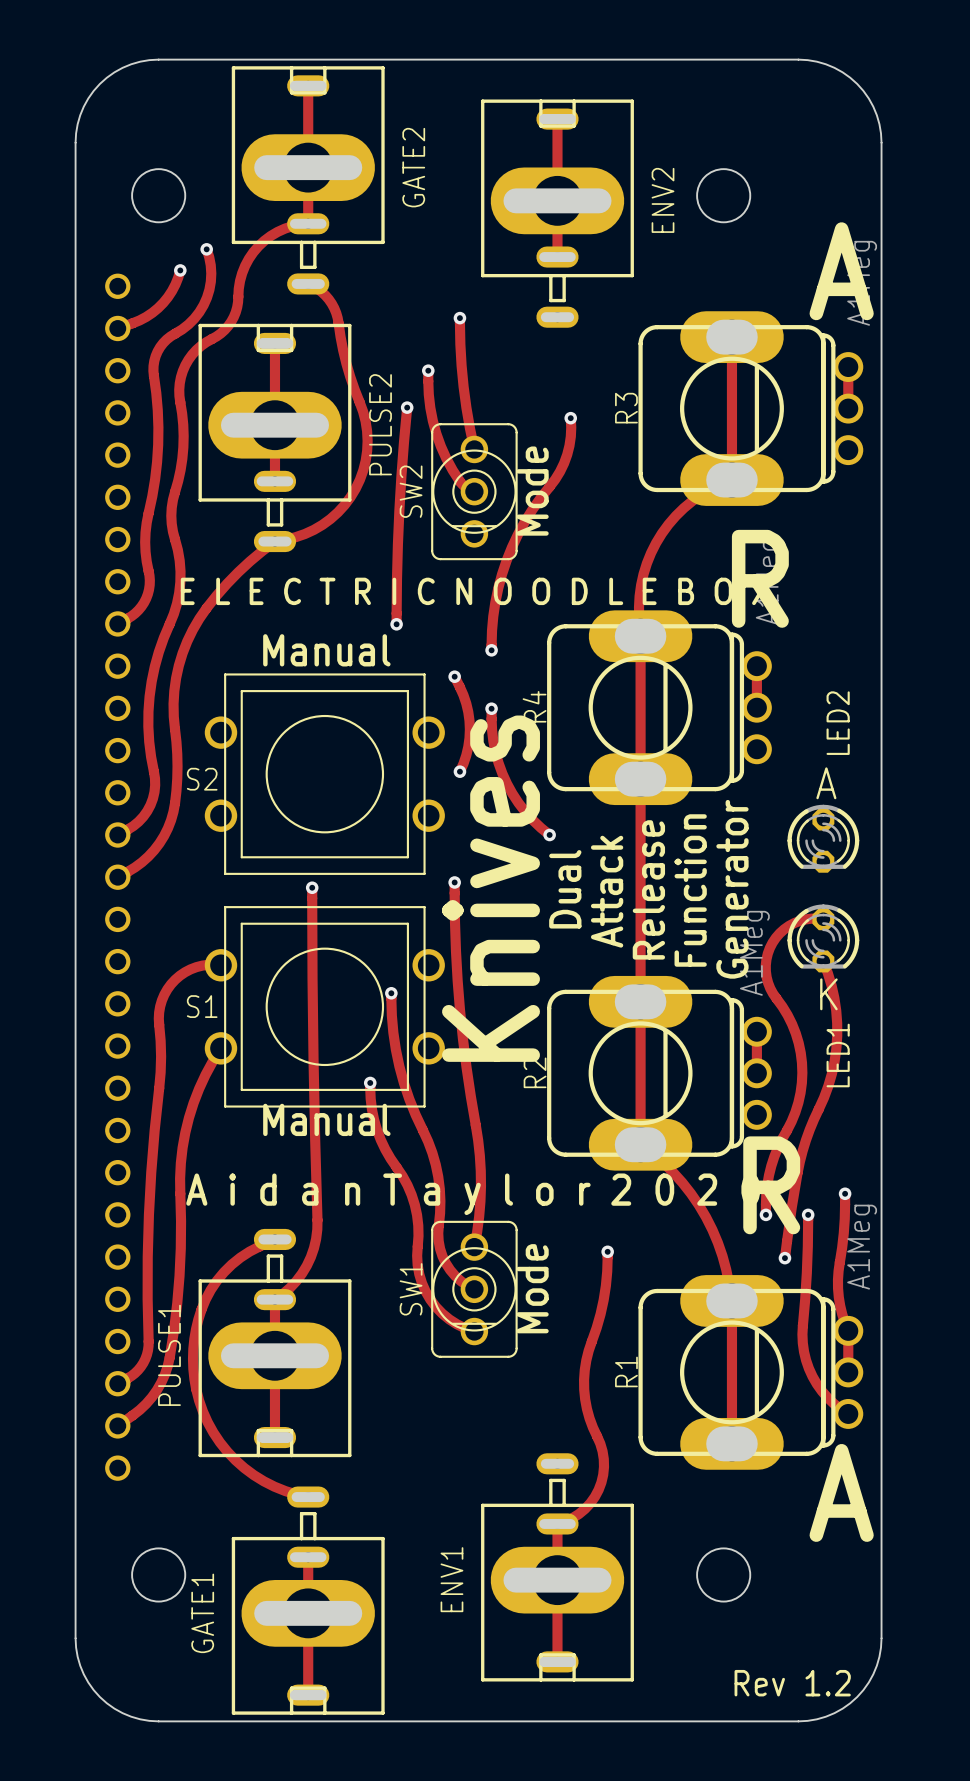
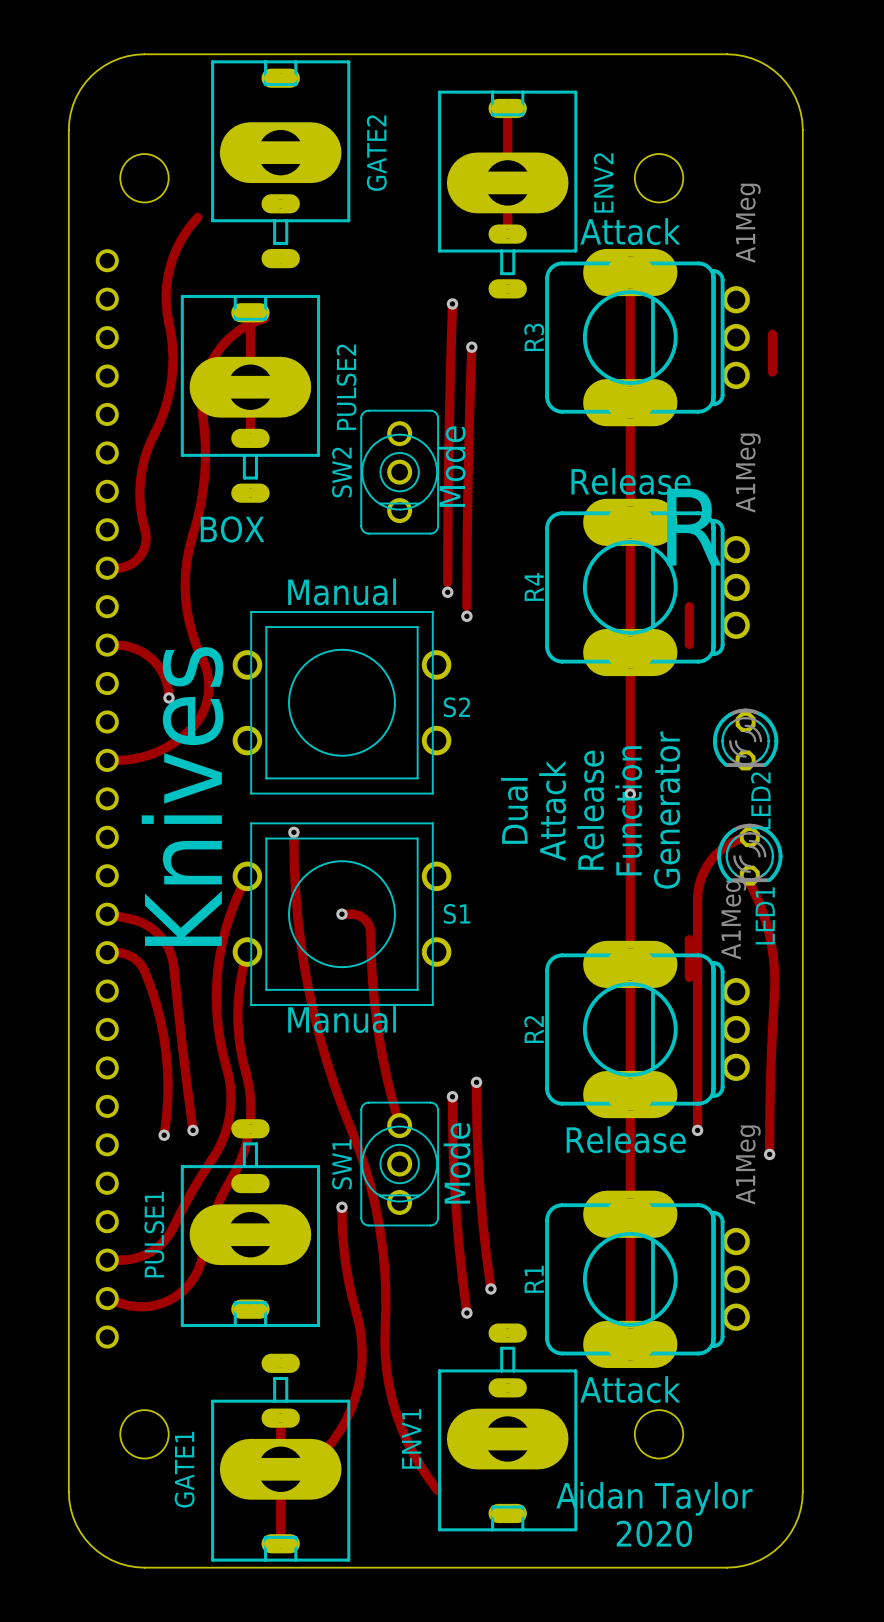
track: (308, 85) (308, 223) (292, 226) (277, 231) (258, 246) (248, 258) (242, 273) (237, 307) (231, 321) (220, 333) (196, 349) (185, 365) (179, 389) (183, 424) (183, 447) (175, 492) -> none
track: (206, 249) (210, 265) (210, 281) (203, 305) (188, 324) (163, 343) (154, 360) (158, 444) (155, 479) (145, 532) (145, 551) (149, 585) (147, 594) (141, 606) (131, 616) (117, 623) -> (197, 217) (180, 240) (173, 257) (168, 275) (166, 304) (172, 345) (172, 368) (167, 402) (146, 451) (141, 471) (140, 500) (146, 536) (144, 546) (137, 558) (129, 565) (119, 568) (107, 568)
via: (206, 249) -> none
text: none -> Attack (630, 231)
track: (180, 270) (172, 290) (158, 308) (139, 320) (117, 328) -> none
via: (180, 270) -> none
text: A (841, 271) -> none
track: (308, 283) (325, 295) (336, 313) (346, 363) (365, 421) (367, 441) (363, 470) (350, 497) (330, 519) (304, 534) (274, 541) (238, 572) (206, 608) (187, 641) (178, 665) (174, 690) (175, 729) -> none
track: none -> (630, 272) (630, 1344)
track: (459, 318) (463, 386) (474, 449) -> none
via: (459, 318) -> none
track: none -> (452, 303) (447, 582)
via: none -> (452, 303)
track: (731, 337) (731, 480) (711, 488) (692, 500) (675, 515) (661, 533) (646, 563) (641, 585) (639, 607) (640, 1144) (672, 1172) (690, 1193) (706, 1217) (722, 1256) (731, 1300) (731, 1443) -> none
track: (428, 370) (430, 407) (440, 446) (459, 481) (466, 487) (474, 491) -> none
via: (428, 370) -> none
track: none -> (471, 347) (466, 606)
via: none -> (471, 347)
track: (407, 407) (399, 510) (396, 624) -> none
via: (407, 407) -> none
R3 position: (750, 408) -> (647, 337)
track: (570, 418) (570, 436) (564, 463) (555, 479) (524, 521) (506, 560) (495, 602) (491, 650) -> none
via: (570, 418) -> none
SW2 position: (474, 491) -> (399, 472)
text position: Mode (532, 491) -> Mode (452, 466)
track: (175, 492) (171, 515) (179, 560) (179, 592) (173, 613) (154, 666) (148, 711) (149, 741) (154, 778) (154, 792) (150, 805) (143, 816) (133, 826) (117, 834) -> (265, 318) (240, 329) (220, 347) (211, 362) (202, 387) (204, 475) (200, 505) (187, 559) (185, 585) (189, 623) (208, 680) (208, 694) (204, 708) (193, 726) (165, 747) (141, 757) (107, 760)
text: none -> Release (630, 481)
text: none -> BOX (232, 529)
text: E L E C T R I C N O O D L E B O X (475, 591) -> none
via: (396, 624) -> none
text position: Manual (326, 650) -> Manual (342, 591)
track: (454, 676) (463, 695) (469, 720) (468, 746) (459, 771) -> none
via: (454, 676) -> none
via: none -> (466, 616)
R4 position: (659, 707) -> (647, 587)
track: none -> (107, 645) (129, 646) (148, 656) (158, 665) (164, 677) (169, 697)
track: (491, 708) (495, 752) (506, 783) (525, 811) (549, 834) -> none
via: (491, 708) -> none
LED2 name position: LED2 (838, 723) -> LED2 (760, 800)
track: (175, 729) (177, 766) (175, 803) -> none
via: none -> (169, 697)
via: (459, 771) -> none
S2 position: (324, 774) -> (341, 702)
S2 name position: S2 (202, 779) -> S2 (456, 707)
text: A (826, 783) -> none
track: (175, 803) (167, 828) (154, 850) (141, 862) (117, 877) -> none
via: (549, 834) -> none
LED2 position: (823, 838) -> (745, 739)
via: none -> (630, 794)
track: (454, 882) (455, 951) (459, 1009) (480, 1170) (480, 1201) (474, 1247) -> none
via: (454, 882) -> none
track: (312, 887) (317, 1229) (313, 1248) (302, 1273) (289, 1288) (274, 1299) (274, 1437) -> none
via position: (312, 887) -> (293, 832)
text position: Knives (491, 888) -> Knives (182, 796)
track: none -> (293, 832) (297, 915) (308, 989) (326, 1060) (365, 1168) (379, 1227) (384, 1266) (385, 1356) (389, 1385) (396, 1414) (407, 1441) (421, 1466) (438, 1490)
track: (823, 919) (805, 919) (789, 925) (772, 942) (766, 959) (765, 971) (770, 988) (787, 1015) (795, 1033) (800, 1052) (802, 1072) (800, 1092) (795, 1112) (771, 1165) (765, 1204) -> (745, 837) (732, 842) (715, 855) (706, 866) (699, 885) (697, 1096)
track: none -> (745, 875) (761, 909) (769, 933) (773, 958) (774, 983) (769, 1154)
track: (823, 961) (831, 985) (836, 1010) (836, 1048) (828, 1085) (809, 1129) (799, 1161) (784, 1258) -> none
track: (220, 965) (202, 965) (185, 972) (167, 989) (160, 1006) (160, 1072) (148, 1214) (148, 1345) (140, 1366) (131, 1376) (117, 1383) -> (247, 876) (235, 901) (225, 928) (217, 970) (216, 998) (218, 1026) (231, 1096) (229, 1115) (225, 1133) (217, 1151) (191, 1192) (170, 1232) (162, 1242) (140, 1256) (127, 1259) (107, 1260)
track: (391, 993) (393, 1032) (399, 1066) (409, 1099) (432, 1153) (438, 1176) (440, 1201) (438, 1233) (440, 1248) (450, 1269) (461, 1281) (474, 1289) -> none
via position: (391, 993) -> (341, 914)
text: K (828, 994) -> none
track: none -> (107, 914) (137, 920) (149, 926) (160, 935) (170, 953) (193, 1130)
track: none -> (341, 914) (361, 916) (370, 928) (372, 982) (378, 1030) (387, 1078) (399, 1125)
S1 name position: S1 (202, 1006) -> S1 (456, 913)
S1 position: (324, 1006) -> (341, 914)
track: none -> (107, 952) (126, 954) (139, 962) (144, 971) (156, 1003) (163, 1035) (167, 1068) (167, 1102) (164, 1135)
track: (220, 1048) (199, 1088) (188, 1117) (182, 1147) (180, 1178) (179, 1275) (174, 1330) (167, 1365) (161, 1382) (151, 1397) (139, 1409) (117, 1425) -> (247, 952) (239, 987) (237, 1012) (240, 1048) (250, 1094) (249, 1127) (241, 1158) (213, 1215) (198, 1270) (185, 1288) (172, 1298) (158, 1304) (135, 1306) (107, 1298)
LED1 name position: LED1 (838, 1055) -> LED1 (765, 915)
R2 position: (659, 1073) -> (647, 1029)
track: (370, 1082) (371, 1109) (377, 1129) (385, 1149) (407, 1185) (414, 1204) (418, 1225) (417, 1265) (421, 1283) (430, 1299) (442, 1313) (457, 1324) (474, 1331) -> none
via: (370, 1082) -> none
text position: Manual (326, 1119) -> Manual (342, 1019)
text: R (771, 1185) -> none
track: none -> (476, 1082) (480, 1190) (490, 1288)
via: none -> (476, 1082)
track: (845, 1193) (843, 1233) (838, 1288) (842, 1314) (848, 1330) (848, 1372) -> none
via: (845, 1193) -> none
text: A i d a n T a y l o r 2 0 2 0 (473, 1194) -> none
track: none -> (452, 1096) (456, 1209) (466, 1312)
via: none -> (452, 1096)
track: none -> (697, 1106) (697, 1130)
via: (765, 1214) -> none
track: (808, 1214) (802, 1334) (804, 1351) (808, 1368) (816, 1384) (827, 1397) (848, 1413) -> none
via: (808, 1214) -> none
track: (274, 1239) (240, 1257) (223, 1272) (210, 1289) (201, 1309) (196, 1329) (193, 1349) (194, 1379) (199, 1400) (207, 1422) (220, 1442) (235, 1460) (253, 1475) (274, 1486) (308, 1497) -> none
via: none -> (193, 1130)
via: none -> (697, 1130)
via: none -> (164, 1135)
track: (607, 1251) (603, 1300) (586, 1360) (584, 1379) (586, 1408) (602, 1451) (603, 1474) (598, 1489) (584, 1509) (572, 1518) (557, 1523) (557, 1661) -> none
via: (607, 1251) -> none
text: none -> Release (626, 1139)
via: (784, 1258) -> none
via: none -> (769, 1154)
text position: Mode (532, 1288) -> Mode (457, 1163)
SW1 position: (474, 1289) -> (399, 1164)
track: none -> (341, 1207) (345, 1263) (359, 1324) (362, 1349) (360, 1373) (355, 1397) (340, 1430) (316, 1459) (297, 1474) (265, 1490)
via: none -> (341, 1207)
R1 position: (750, 1372) -> (647, 1279)
via: none -> (490, 1288)
via: none -> (466, 1312)
text: A (841, 1492) -> none
text: none -> Attack (630, 1389)
text: none -> Aidan Taylor (654, 1498)
text: Rev 1.2 (792, 1683) -> 2020 (654, 1533)

